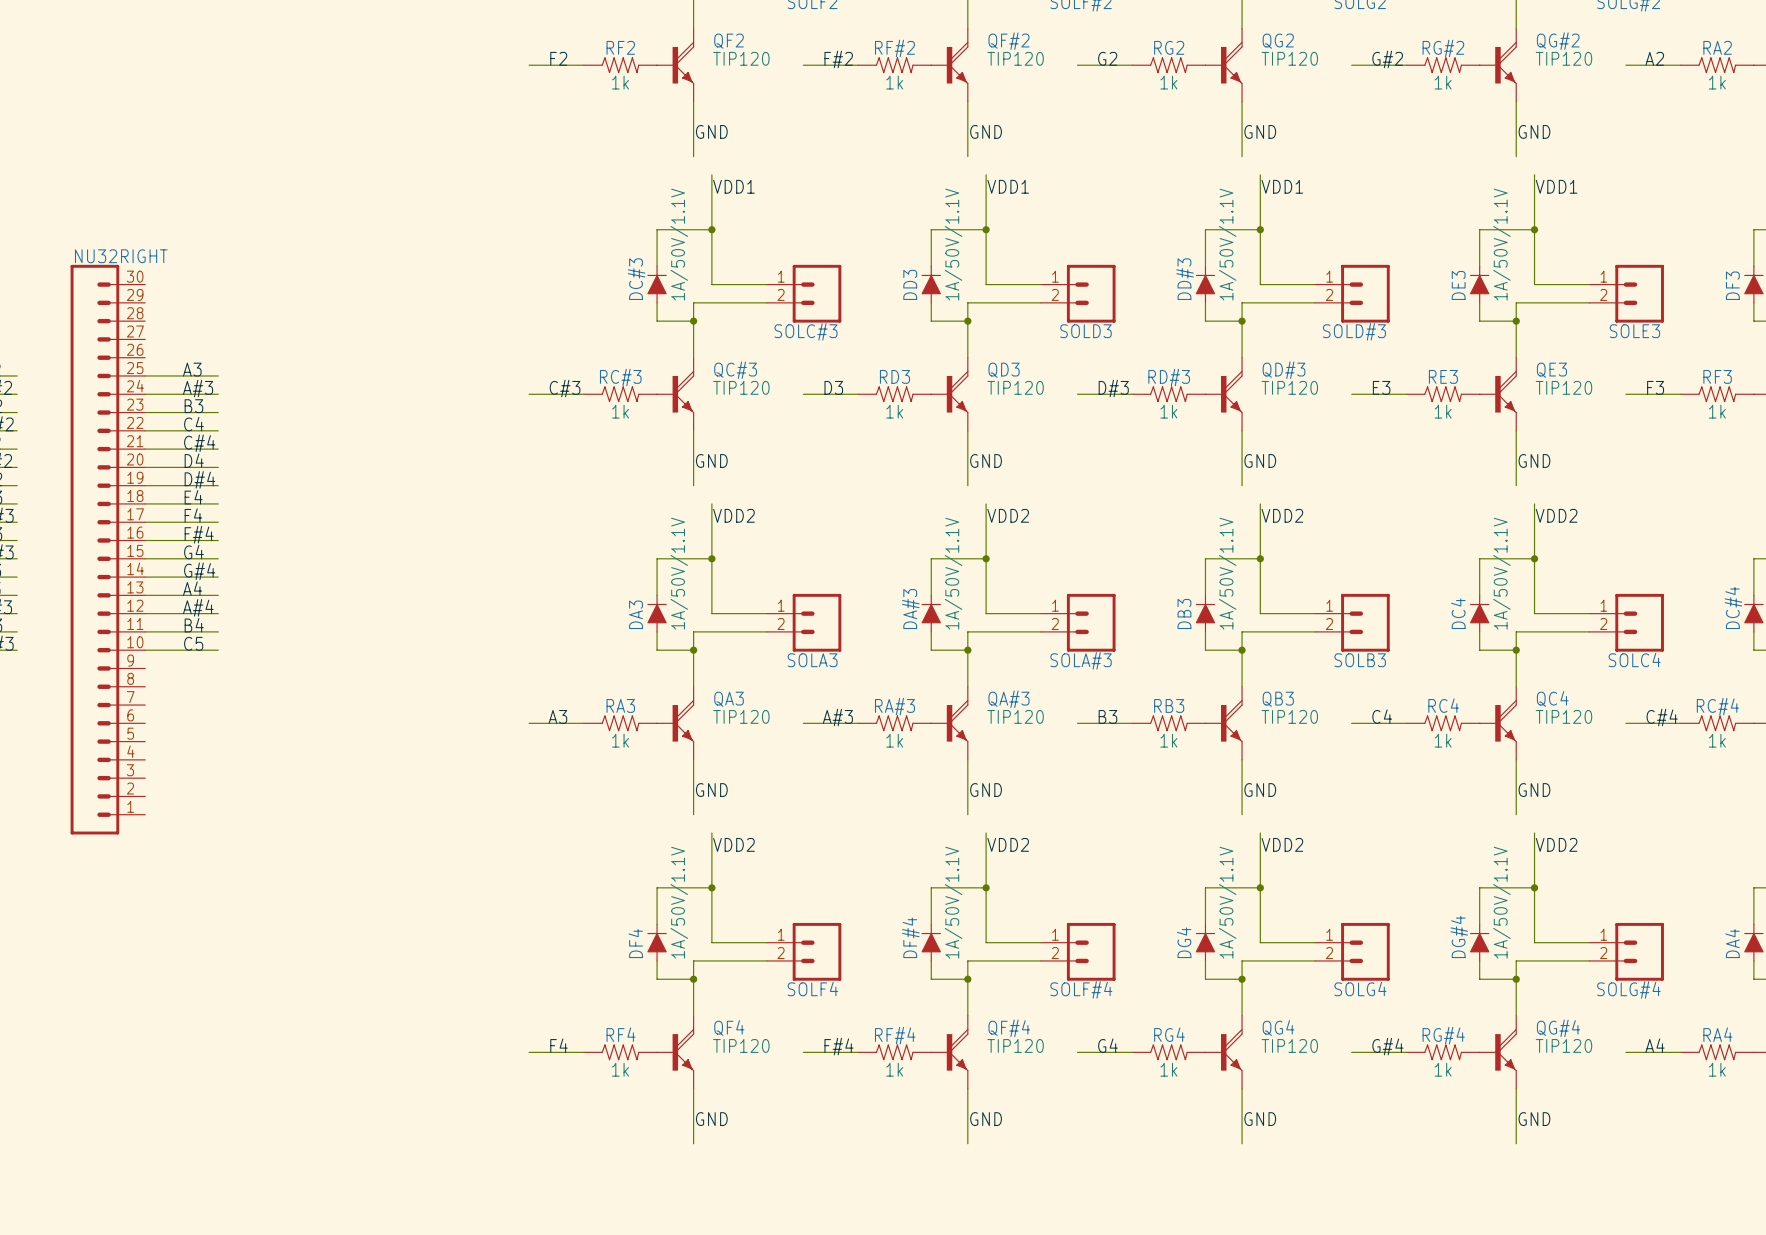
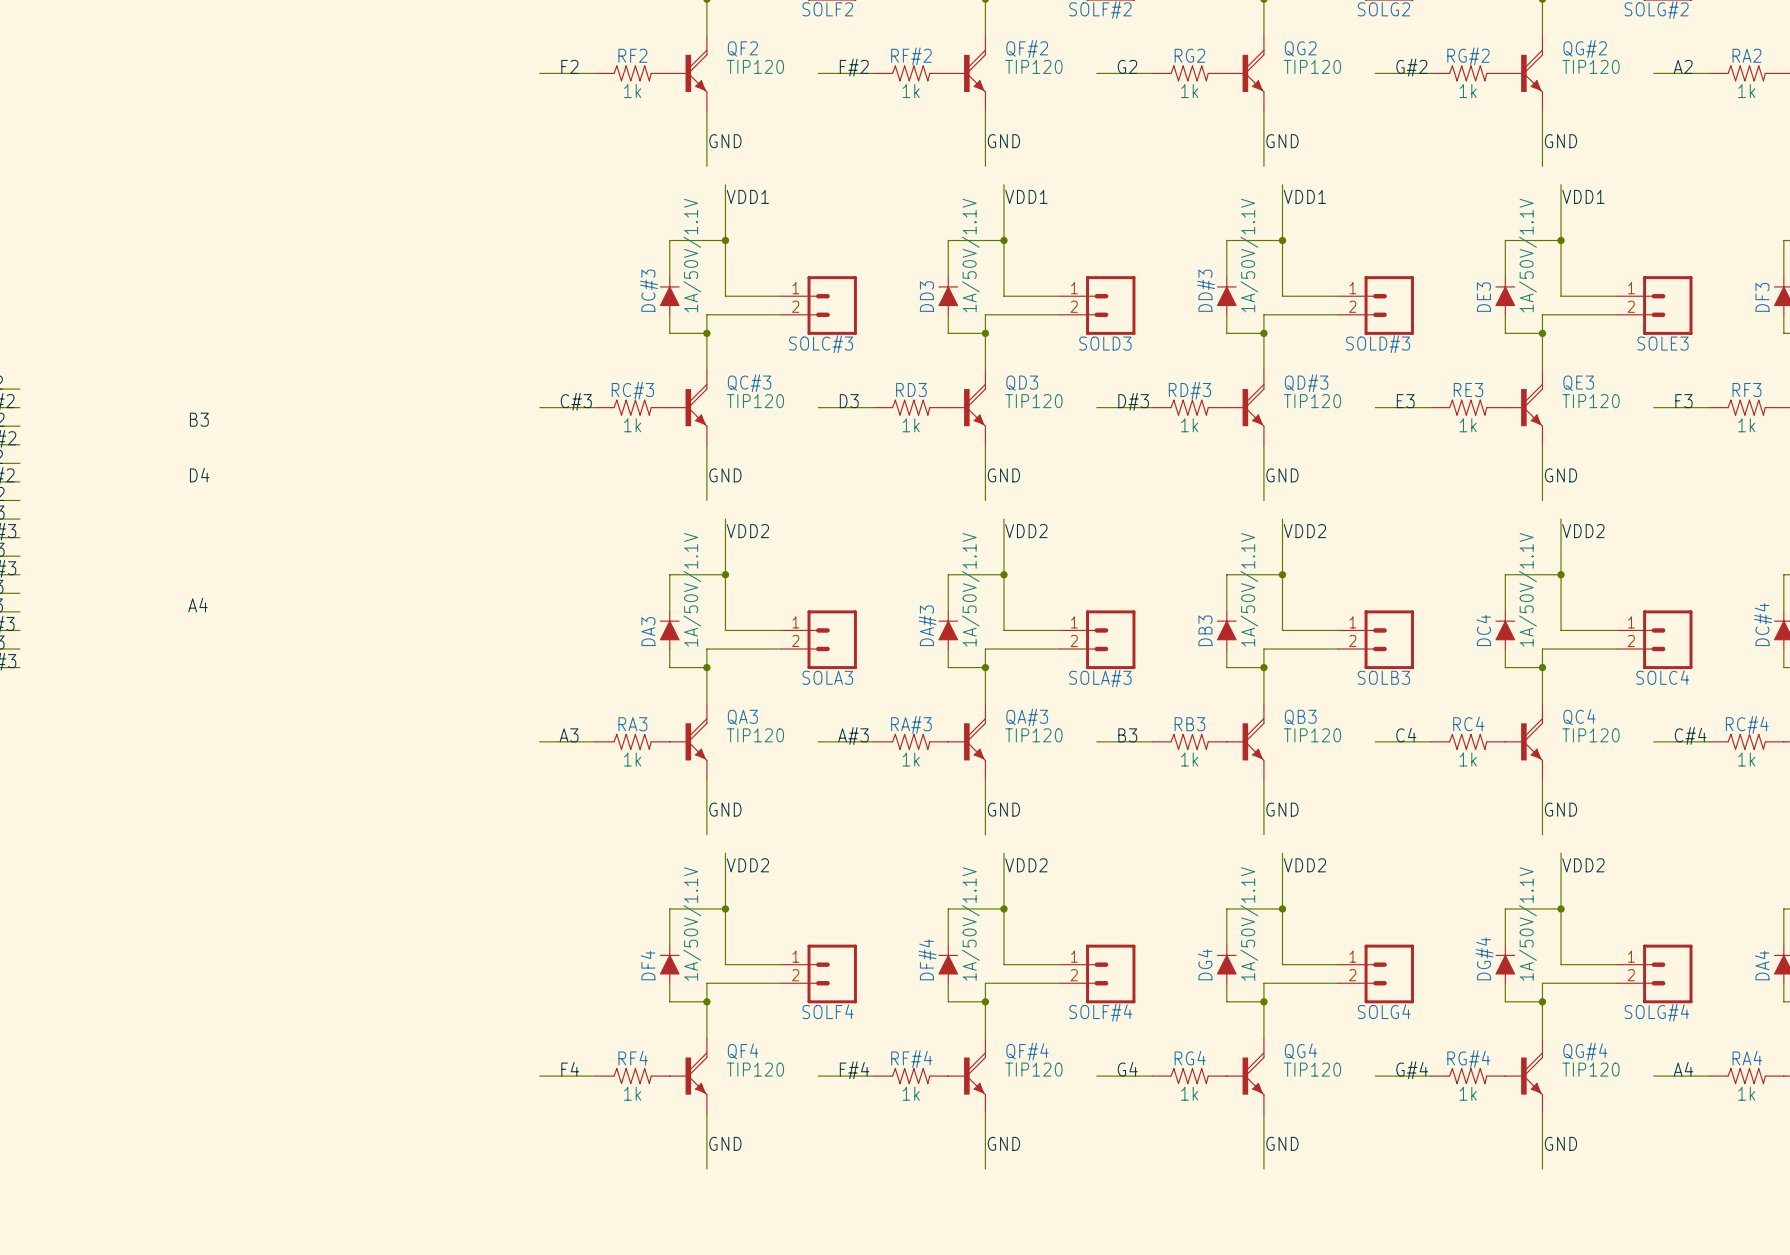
label: A3 (192, 369) -> none
wire: (145, 375) (218, 375) -> none
label: A#3 (198, 388) -> none
wire: (145, 394) (218, 394) -> none
wire: (145, 412) (218, 412) -> none
label: C4 (193, 424) -> none
wire: (145, 430) (218, 430) -> none
label: C#4 (199, 443) -> none
wire: (145, 449) (218, 449) -> none
wire: (145, 467) (218, 467) -> none
label: D#4 (199, 479) -> none
wire: (145, 485) (218, 485) -> none
label: E4 (193, 497) -> none
wire: (145, 503) (218, 503) -> none
label: F4 (193, 515) -> none
wire: (145, 522) (218, 522) -> none
label: F#4 (199, 534) -> none
wire: (145, 540) (218, 540) -> none
NU32RIGHT: (107, 549) -> none
label: G4 (193, 552) -> none
wire: (145, 558) (218, 558) -> none
label: G#4 (199, 571) -> none
wire: (145, 577) (218, 577) -> none
wire: (145, 595) (218, 595) -> none
label: A#4 (198, 607) -> none
wire: (145, 613) (218, 613) -> none
label: B4 (194, 625) -> none
wire: (145, 631) (218, 631) -> none
label: C5 (193, 643) -> none
wire: (145, 650) (218, 650) -> none

